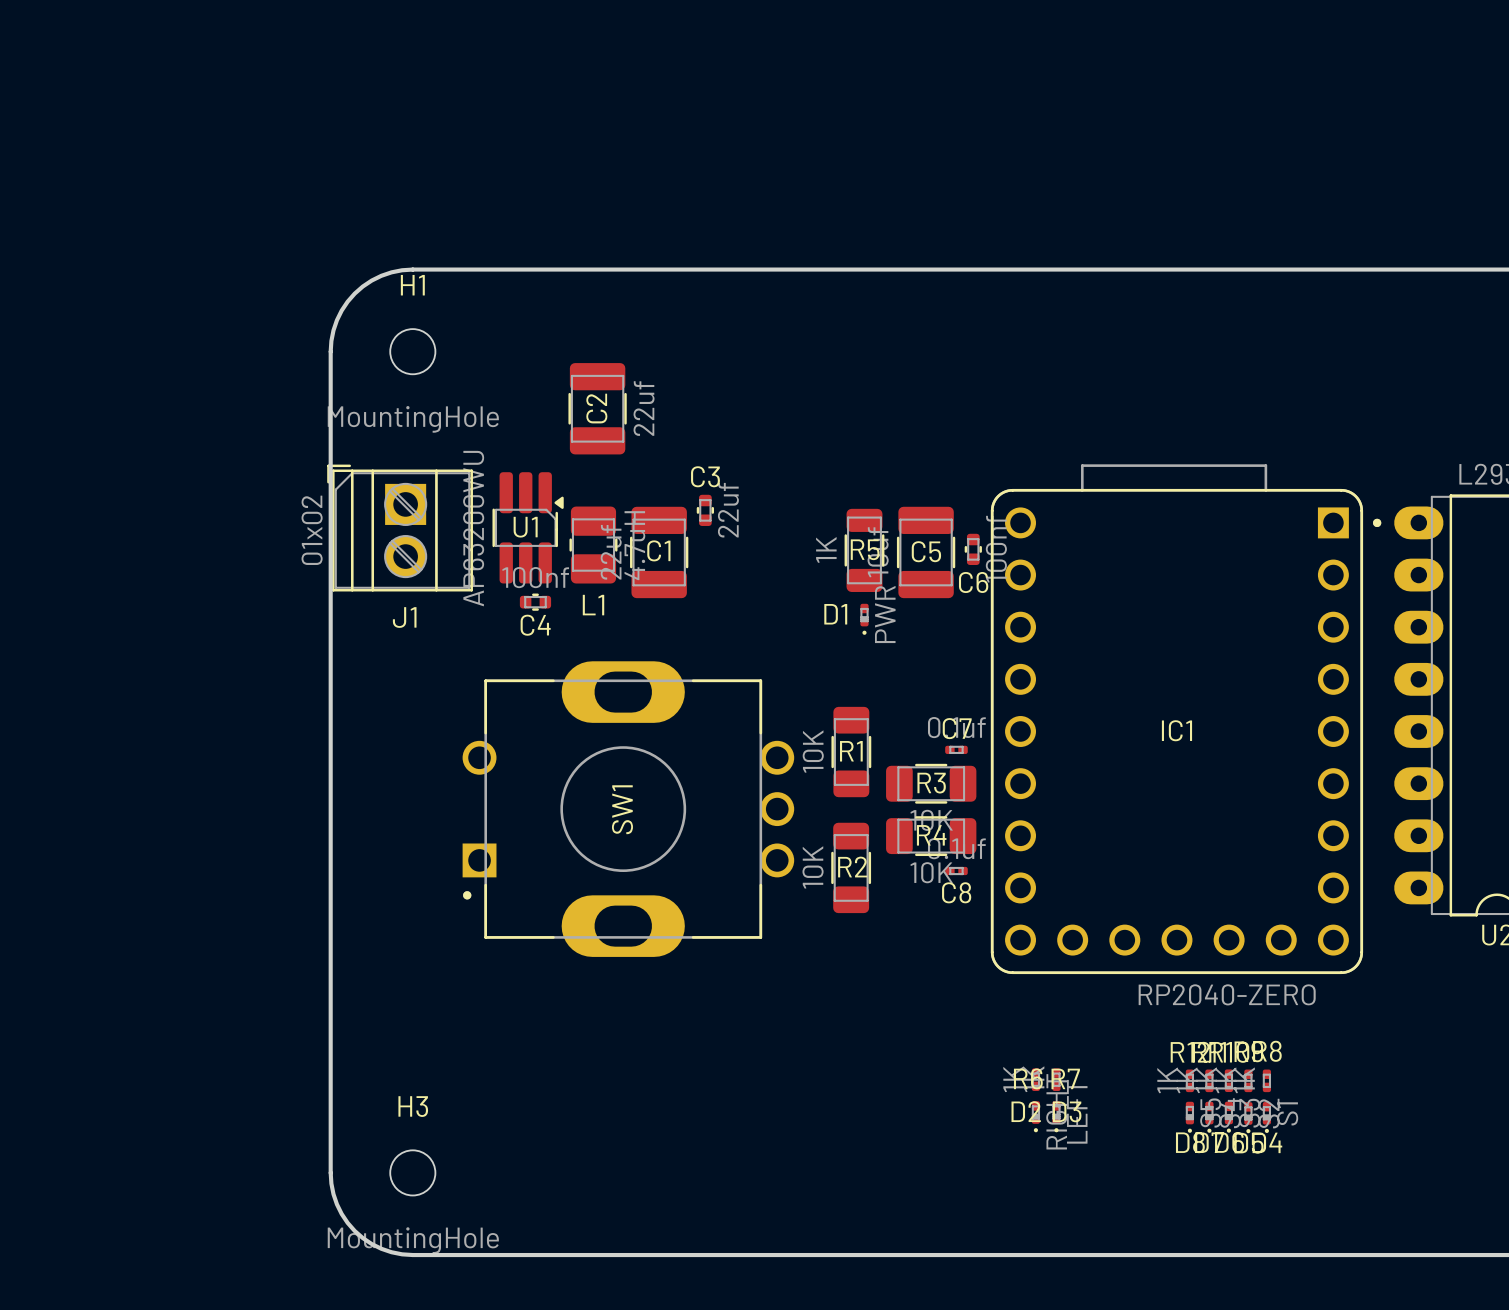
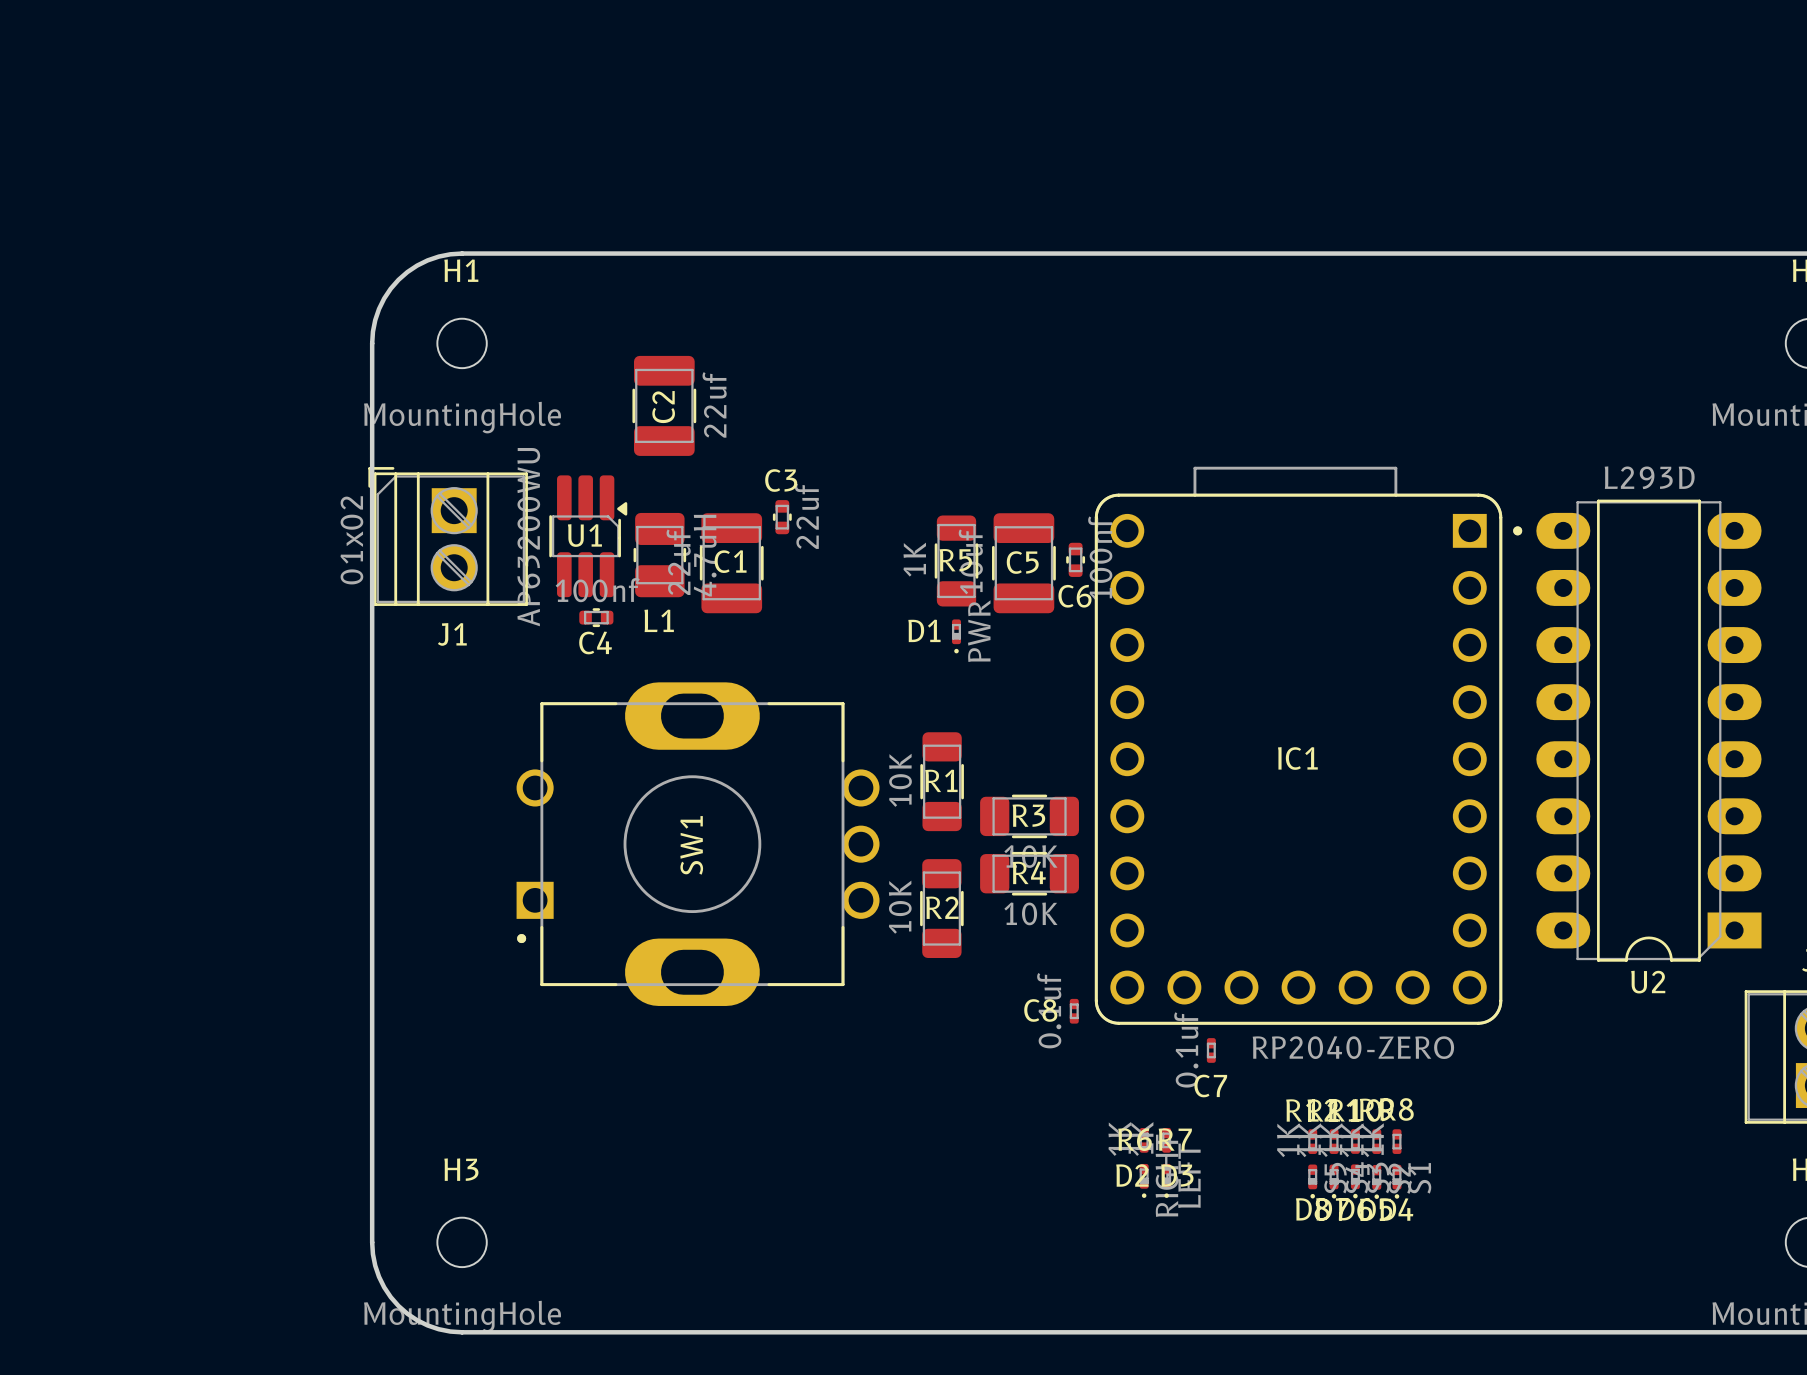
C7 rotation: 0° (956, 749) -> 90° clockwise (1211, 1050)
C7 position: (956, 749) -> (1211, 1050)
C8 rotation: 0° (956, 871) -> 90° clockwise (1074, 1011)
C8 position: (956, 871) -> (1074, 1011)

